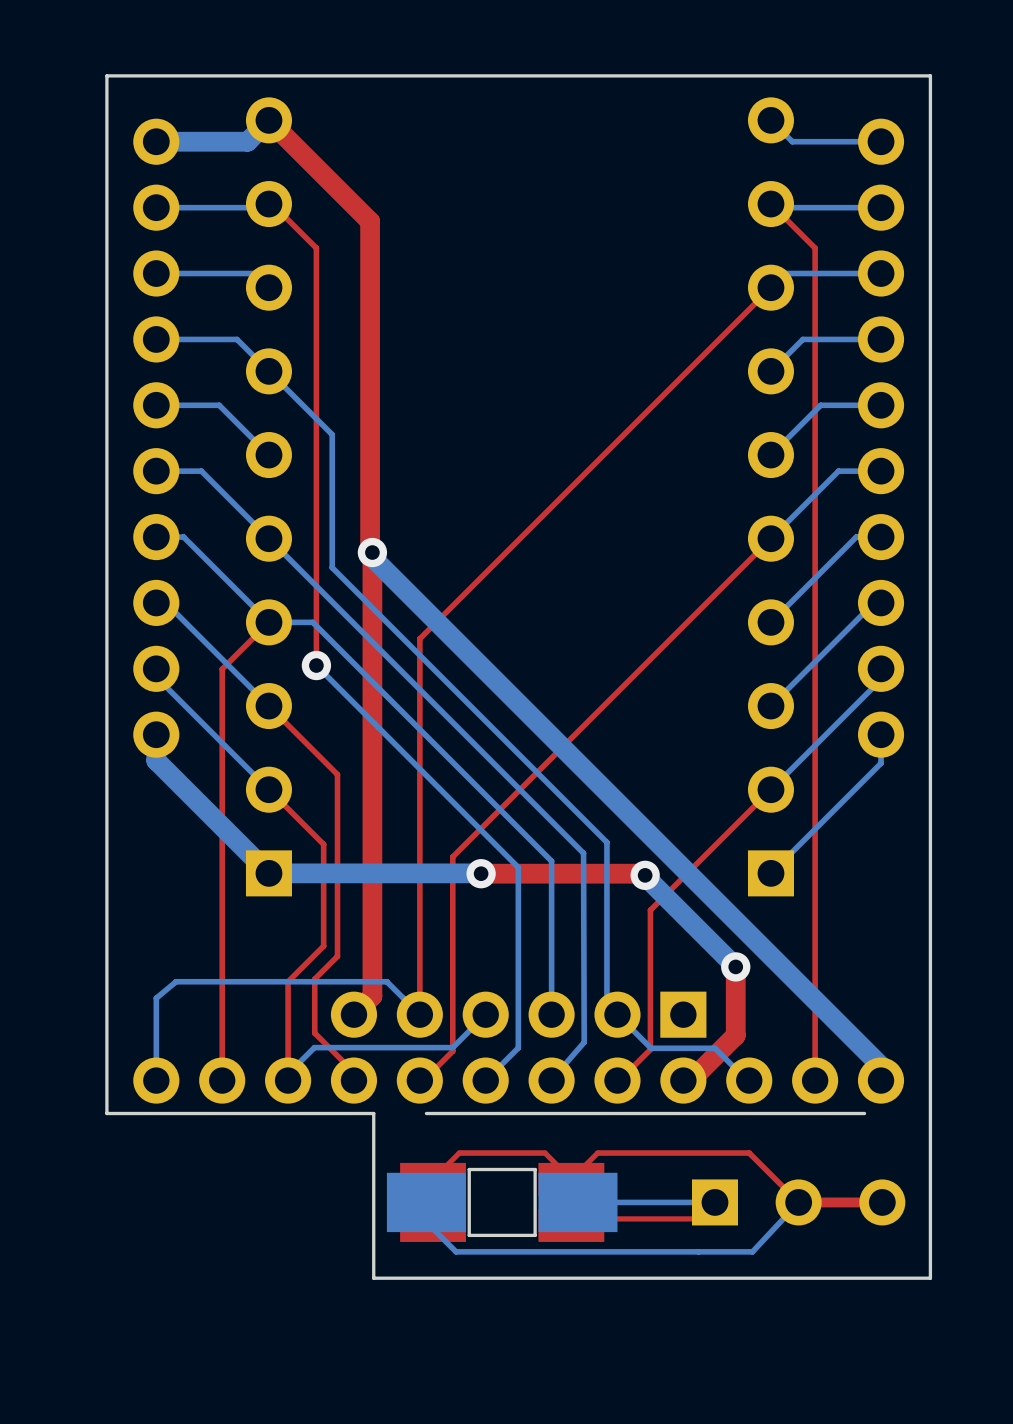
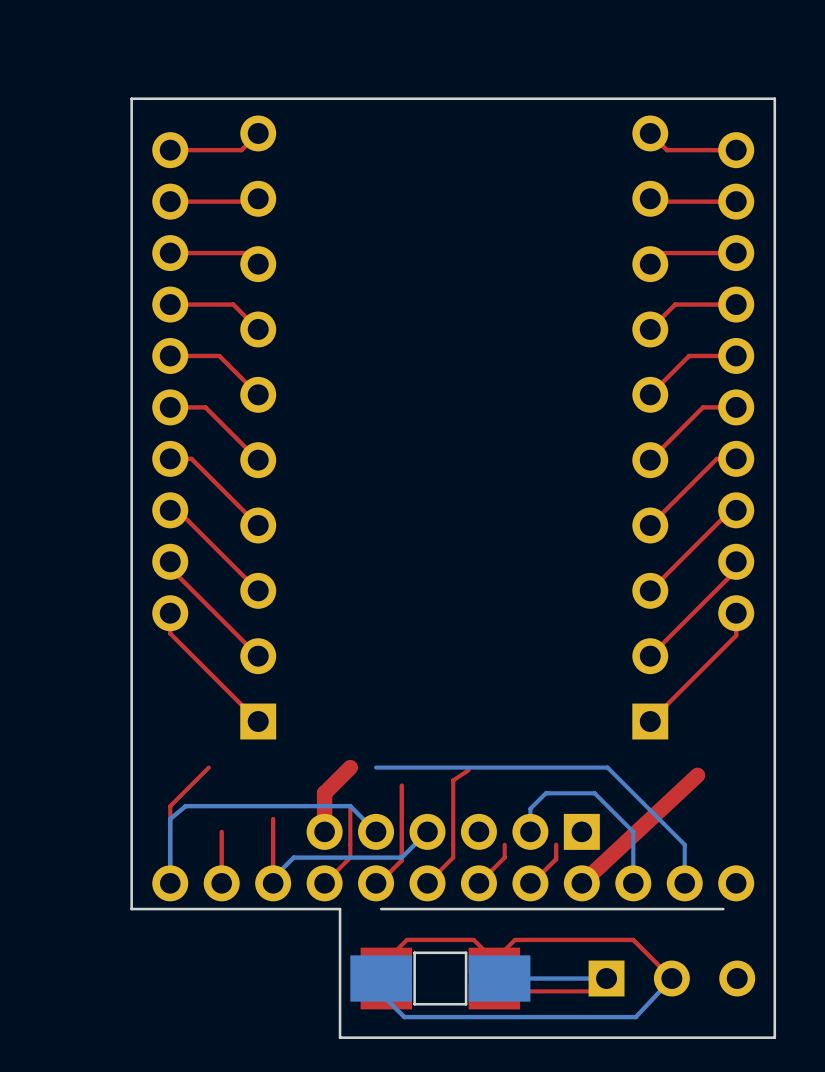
top track: (268, 120) (370, 221) (372, 996) (353, 1014) -> (350, 767) (324, 793) (324, 831)
top track: none -> (258, 133) (241, 150) (170, 150)
bottom track: (268, 120) (247, 141) (156, 141) -> none
top track: none -> (650, 133) (666, 150) (736, 150)
bottom track: (770, 120) (792, 141) (881, 141) -> none
top track: (268, 204) (272, 204) (316, 248) (316, 665) -> none
bottom track: (268, 204) (265, 207) (156, 207) -> none
top track: none -> (650, 198) (653, 201) (736, 201)
top track: none -> (255, 201) (170, 201)
top track: (774, 207) (815, 248) (815, 1080) -> none
bottom track: (881, 207) (774, 207) (770, 204) (770, 207) -> none
bottom track: (156, 273) (254, 273) (268, 287) -> none
top track: none -> (247, 253) (170, 253)
top track: none -> (736, 253) (661, 253)
bottom track: (881, 273) (785, 273) (770, 287) -> none
top track: (770, 287) (419, 638) (419, 1014) -> none
top track: none -> (170, 304) (233, 304) (258, 329)
bottom track: (156, 339) (237, 339) (332, 434) (332, 567) (606, 842) (606, 1004) (651, 1048) (714, 1048) (749, 1080) -> (530, 831) (530, 808) (545, 793) (594, 793) (633, 831) (633, 883)
top track: none -> (736, 304) (675, 304) (650, 329)
bottom track: (881, 339) (802, 339) (770, 371) -> none
top track: none -> (170, 355) (219, 355) (258, 394)
bottom track: (156, 405) (219, 405) (268, 455) -> none
top track: none -> (736, 355) (689, 355) (650, 394)
bottom track: (881, 405) (820, 405) (770, 455) -> none
top track: none -> (170, 407) (205, 407) (258, 460)
bottom track: (156, 471) (201, 471) (583, 853) (584, 1042) (550, 1080) -> none
bottom track: (881, 471) (838, 471) (770, 538) -> none
bottom track: (156, 537) (183, 537) (268, 622) (312, 622) (551, 861) (551, 1014) -> none
top track: none -> (736, 458) (716, 458) (650, 525)
bottom track: (881, 537) (856, 537) (770, 622) -> none
top track: (770, 538) (452, 856) (452, 955) -> (650, 460) (703, 407) (736, 407)
bottom track: (372, 552) (375, 555) (375, 560) (881, 1066) (881, 1080) -> none
via: (372, 552) -> none
top track: none -> (170, 510) (177, 510) (258, 590)
bottom track: (156, 602) (165, 602) (268, 706) -> none
top track: none -> (736, 510) (730, 510) (650, 590)
bottom track: (881, 602) (874, 602) (770, 706) -> none
top track: (268, 622) (222, 669) (222, 1014) -> (258, 525) (191, 458) (170, 458)
bottom track: (316, 665) (518, 867) (518, 1047) (485, 1080) -> none
via: (316, 665) -> none
bottom track: (156, 668) (156, 677) (268, 789) -> none
bottom track: (881, 668) (881, 679) (770, 789) -> none
top track: (268, 706) (337, 774) (337, 956) (314, 979) (314, 1033) (353, 1072) (353, 1080) -> (350, 806) (350, 857) (324, 883)
top track: none -> (170, 613) (170, 633) (258, 721)
bottom track: (156, 734) (156, 760) (268, 873) (480, 873) -> none
top track: none -> (736, 613) (736, 635) (650, 721)
bottom track: (881, 734) (881, 763) (770, 873) -> none
top track: (268, 789) (323, 844) (323, 946) (288, 981) (288, 998) -> (258, 656) (170, 568) (170, 561)
top track: (770, 789) (650, 910) (650, 1031) -> (650, 656) (736, 570) (736, 561)
top track: (481, 873) (643, 873) (645, 875) -> none
via: (481, 873) -> none
bottom track: (645, 875) (735, 966) -> none
via: (645, 875) -> none
top track: none -> (208, 767) (170, 806) (170, 870)
bottom track: none -> (376, 767) (607, 767) (684, 844) (684, 883)
top track: none -> (468, 770) (453, 780) (453, 857) (427, 883)
top track: (735, 966) (735, 1035) (690, 1080) (683, 1080) -> (697, 775) (581, 883)
via: (735, 966) -> none
top track: none -> (504, 844) (504, 857) (478, 883)
top track: (882, 1202) (798, 1202) -> none

